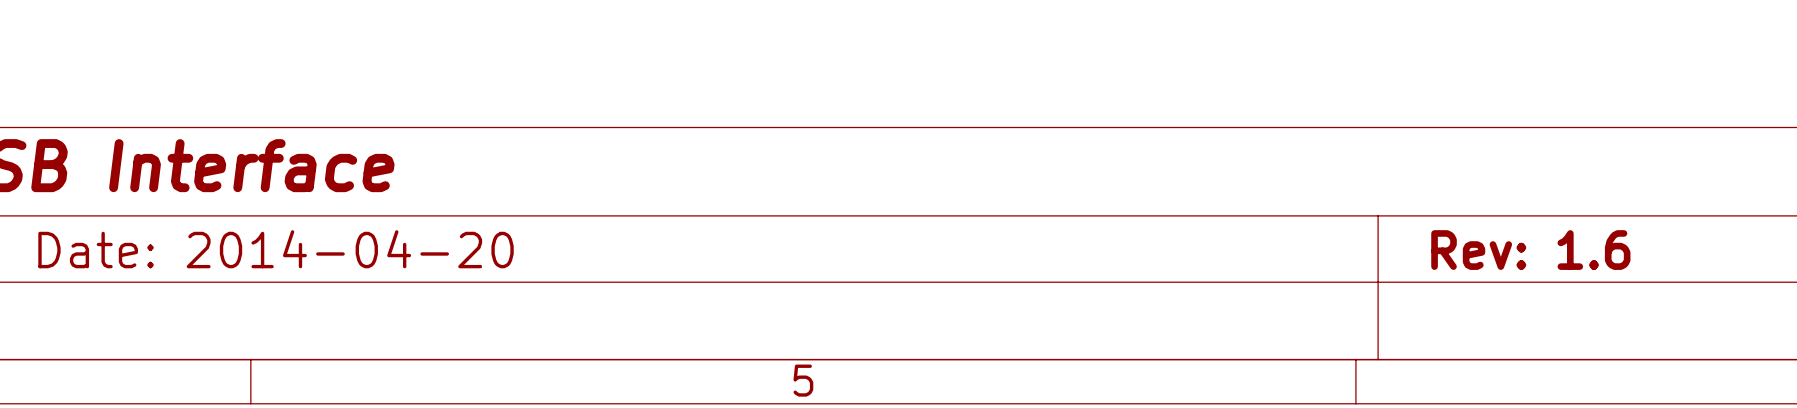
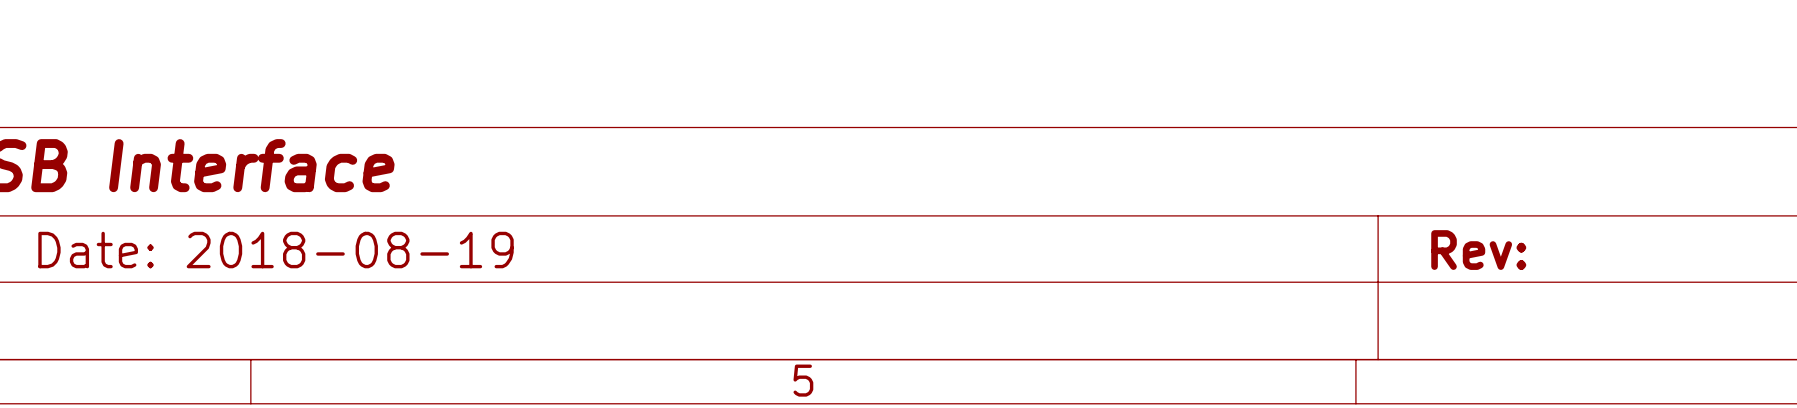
title block: Date: 2014-04-20 (276, 249) -> Date: 2018-08-19 (276, 250)
title block: Rev: 1.6 (1530, 250) -> Rev: (1478, 250)

